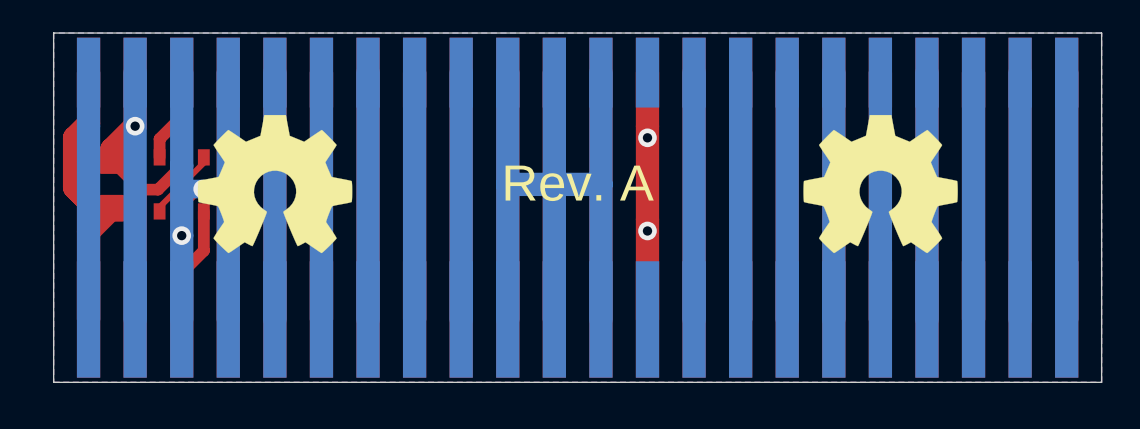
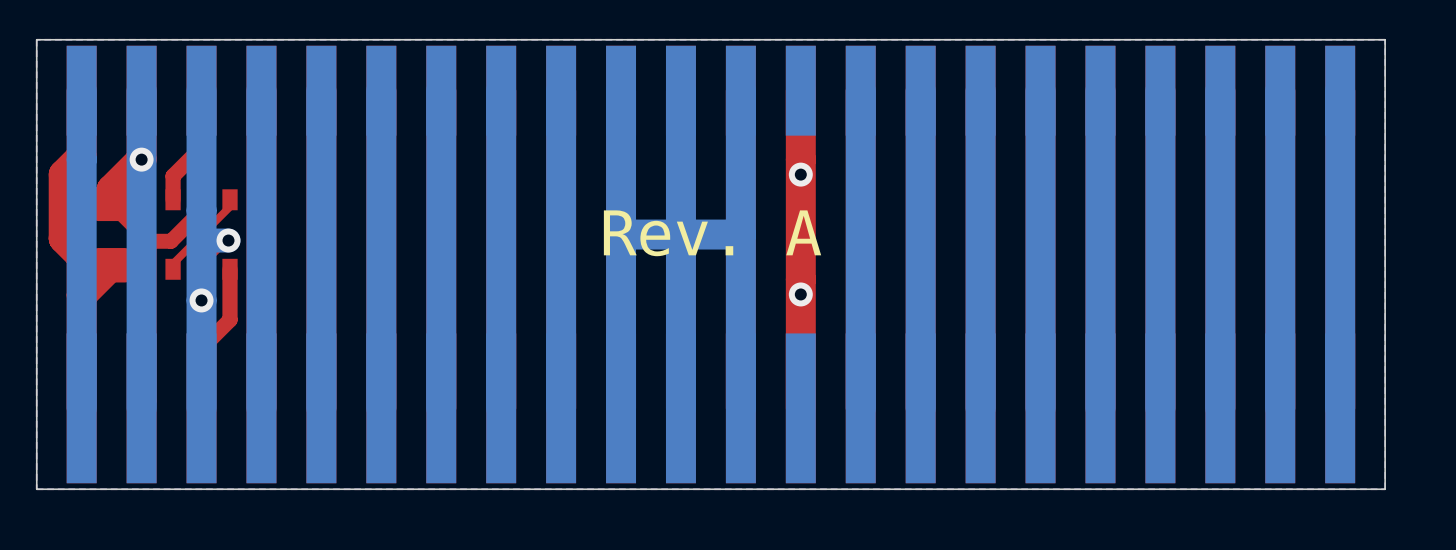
drawing: [197, 114, 353, 254] -> none
drawing: [803, 114, 958, 254] -> none

